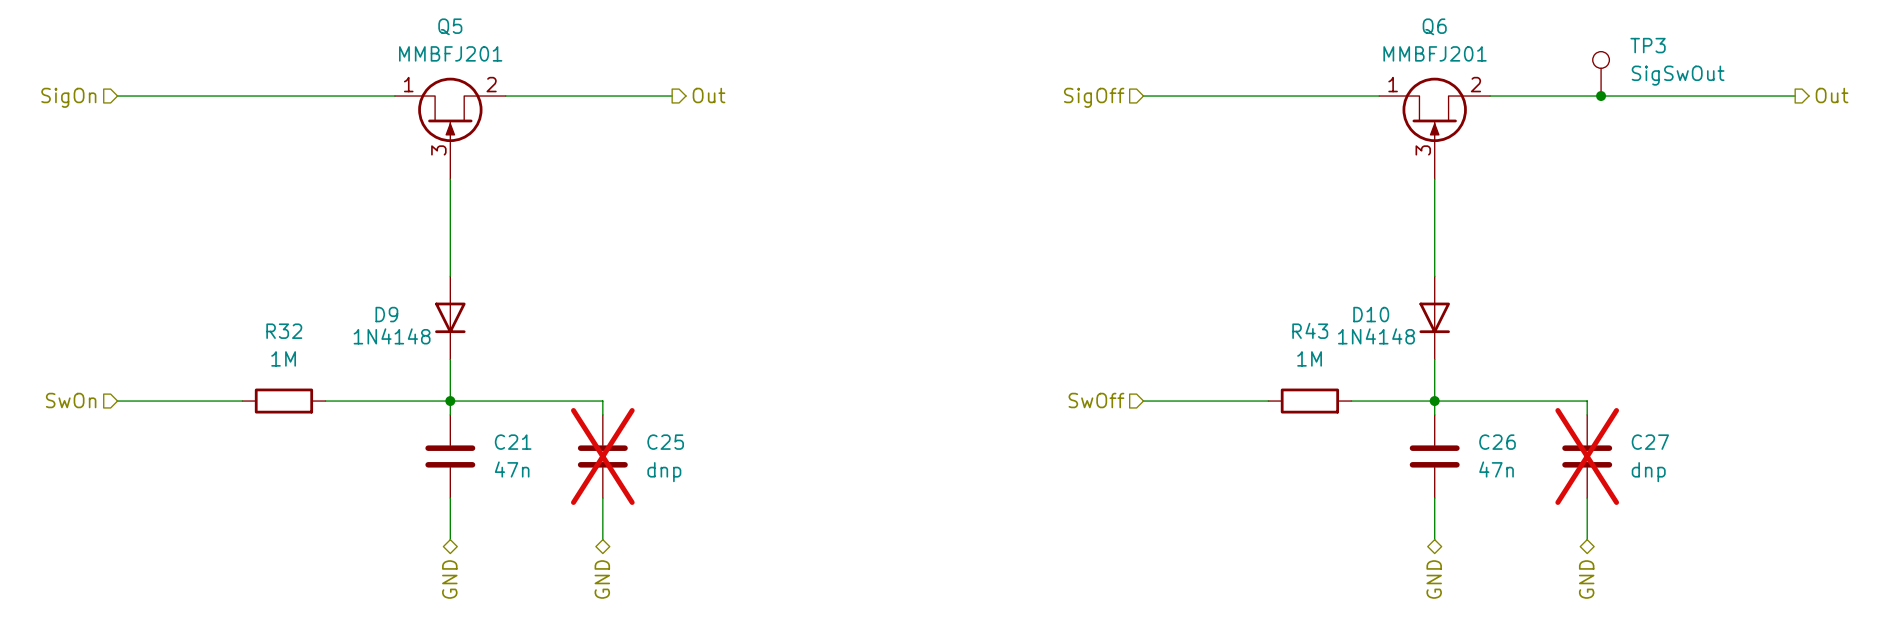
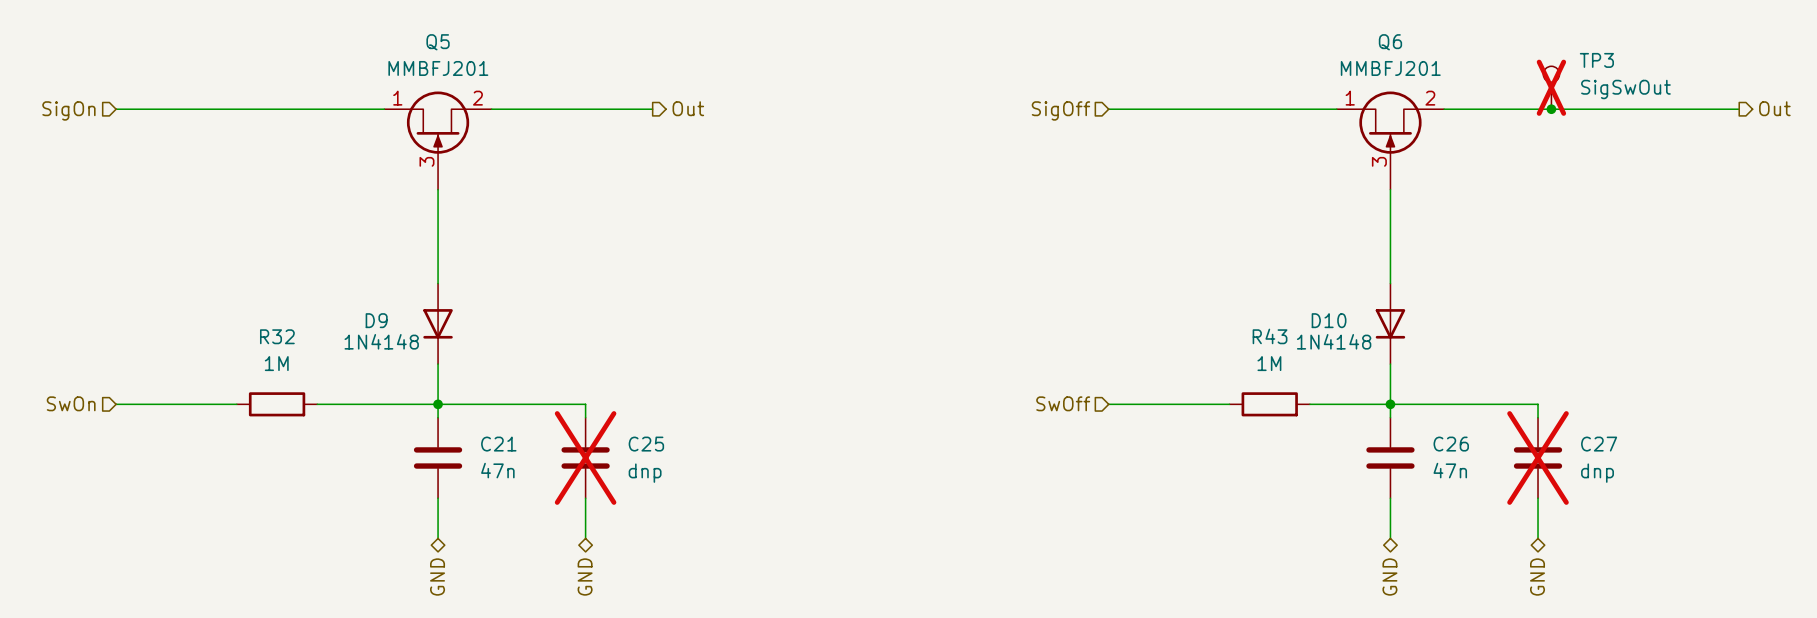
TP3 do-not-place cross: none -> (1551, 87)

